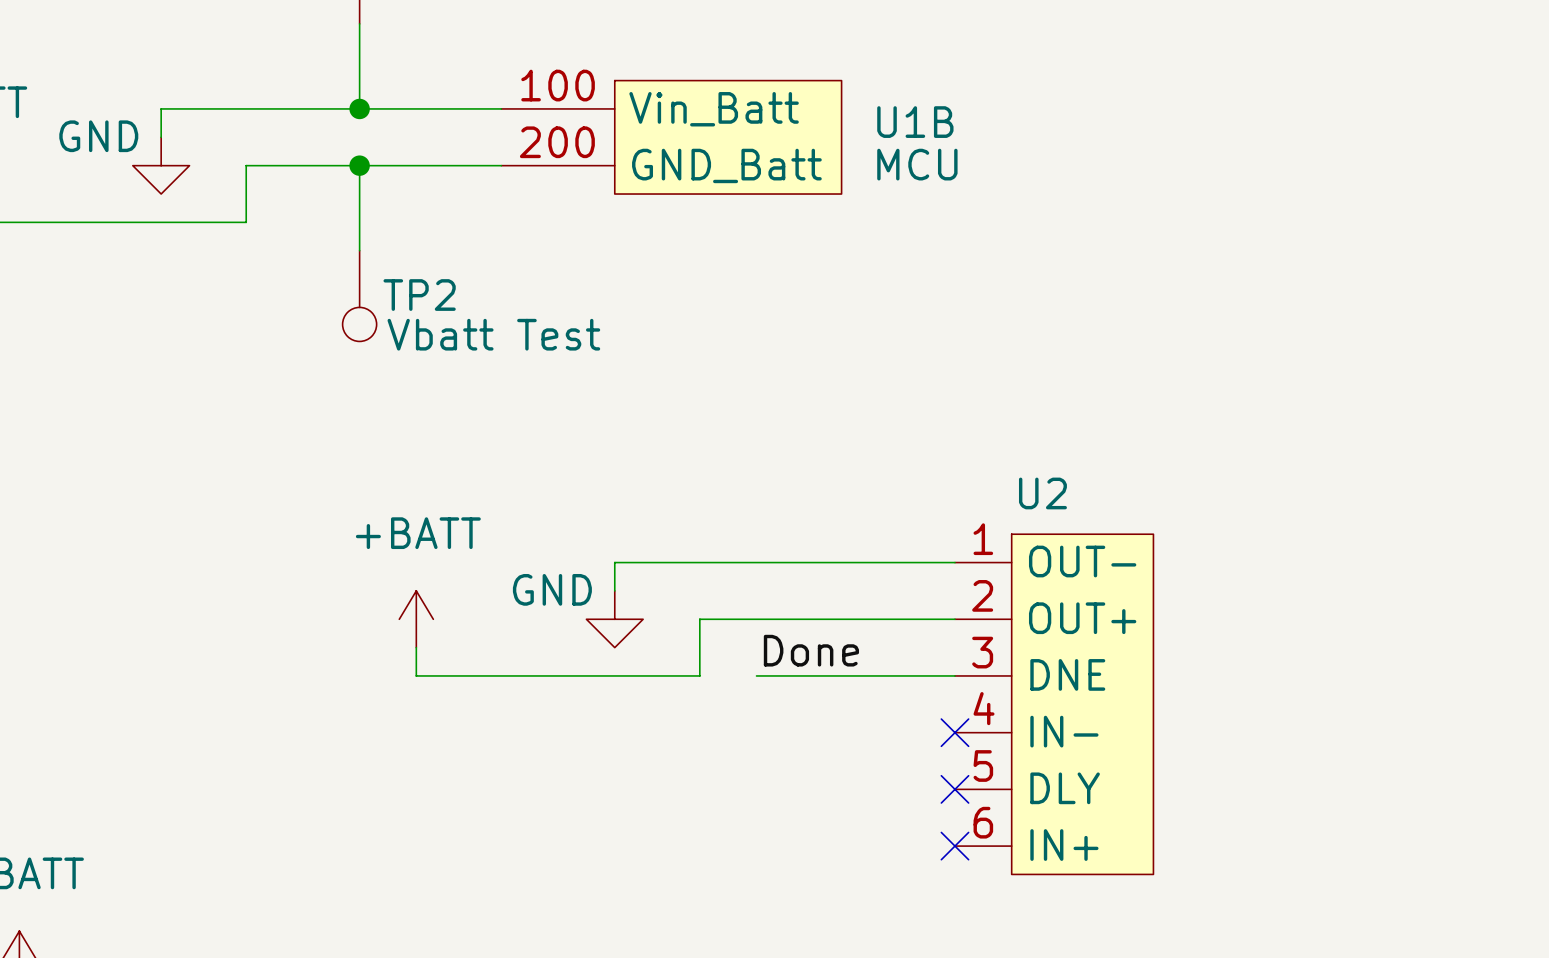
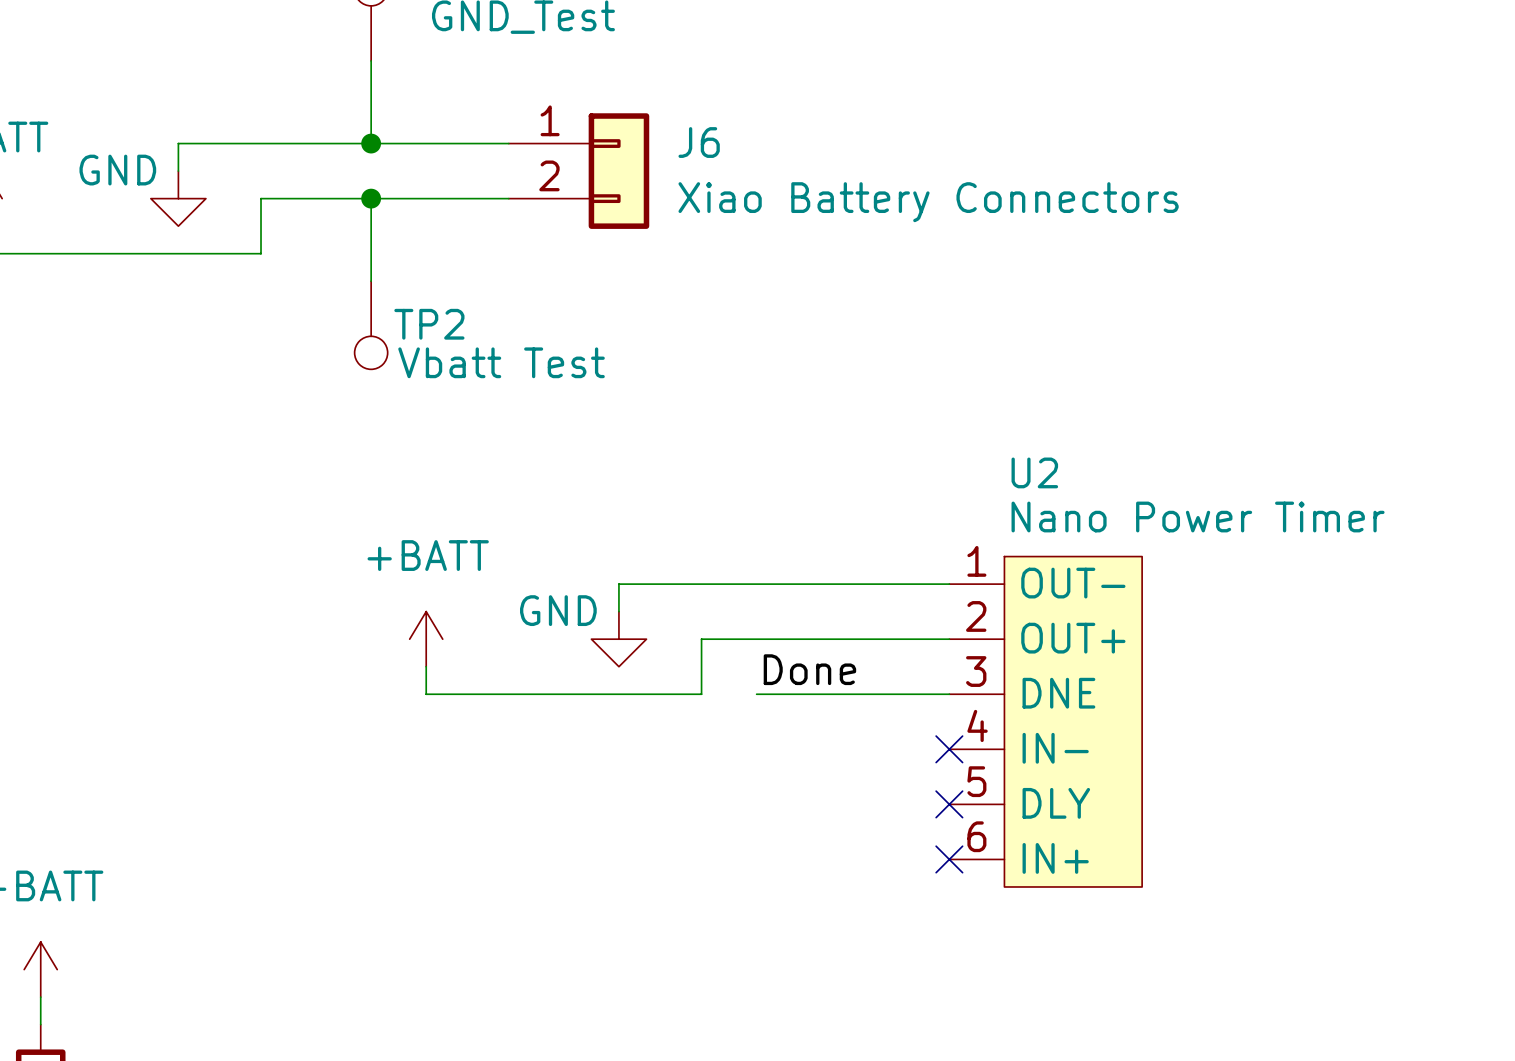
J6: none -> Xiao Battery Connectors (579, 171)
U1B: MCU (671, 137) -> none
U2 name position: U2 (1042, 493) -> U2 (1034, 472)
U2 value: none -> Nano Power Timer (1198, 516)

